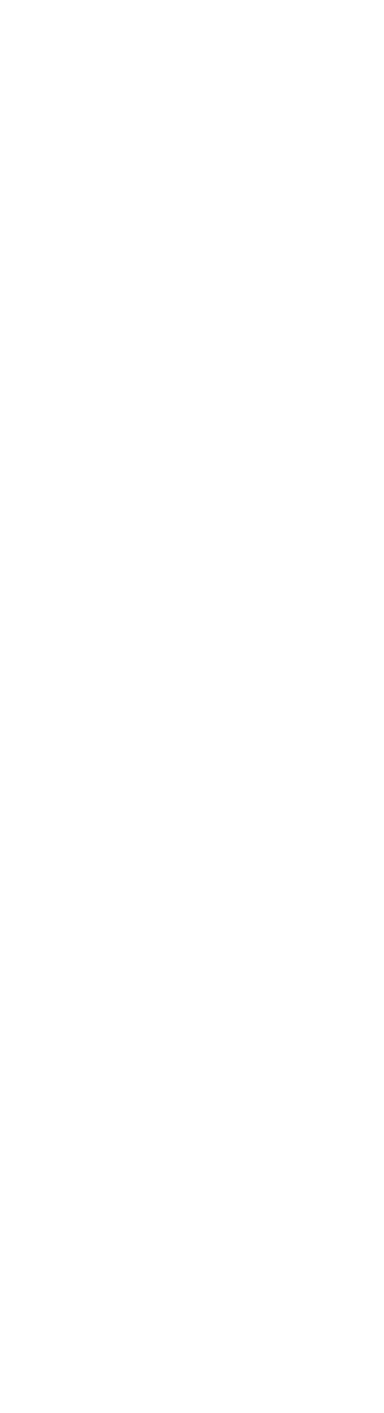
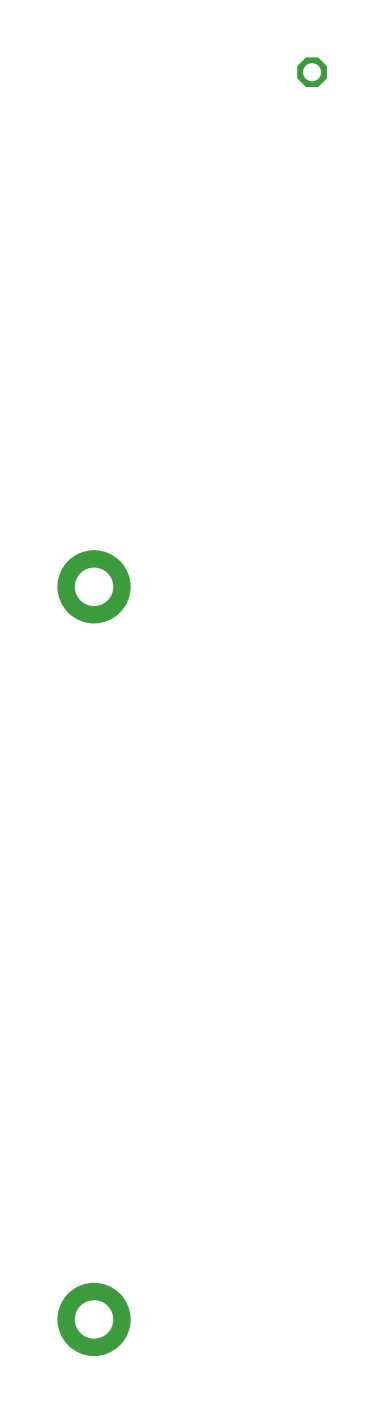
part: none -> (312, 72)
part: none -> (94, 586)
part: none -> (94, 1319)

